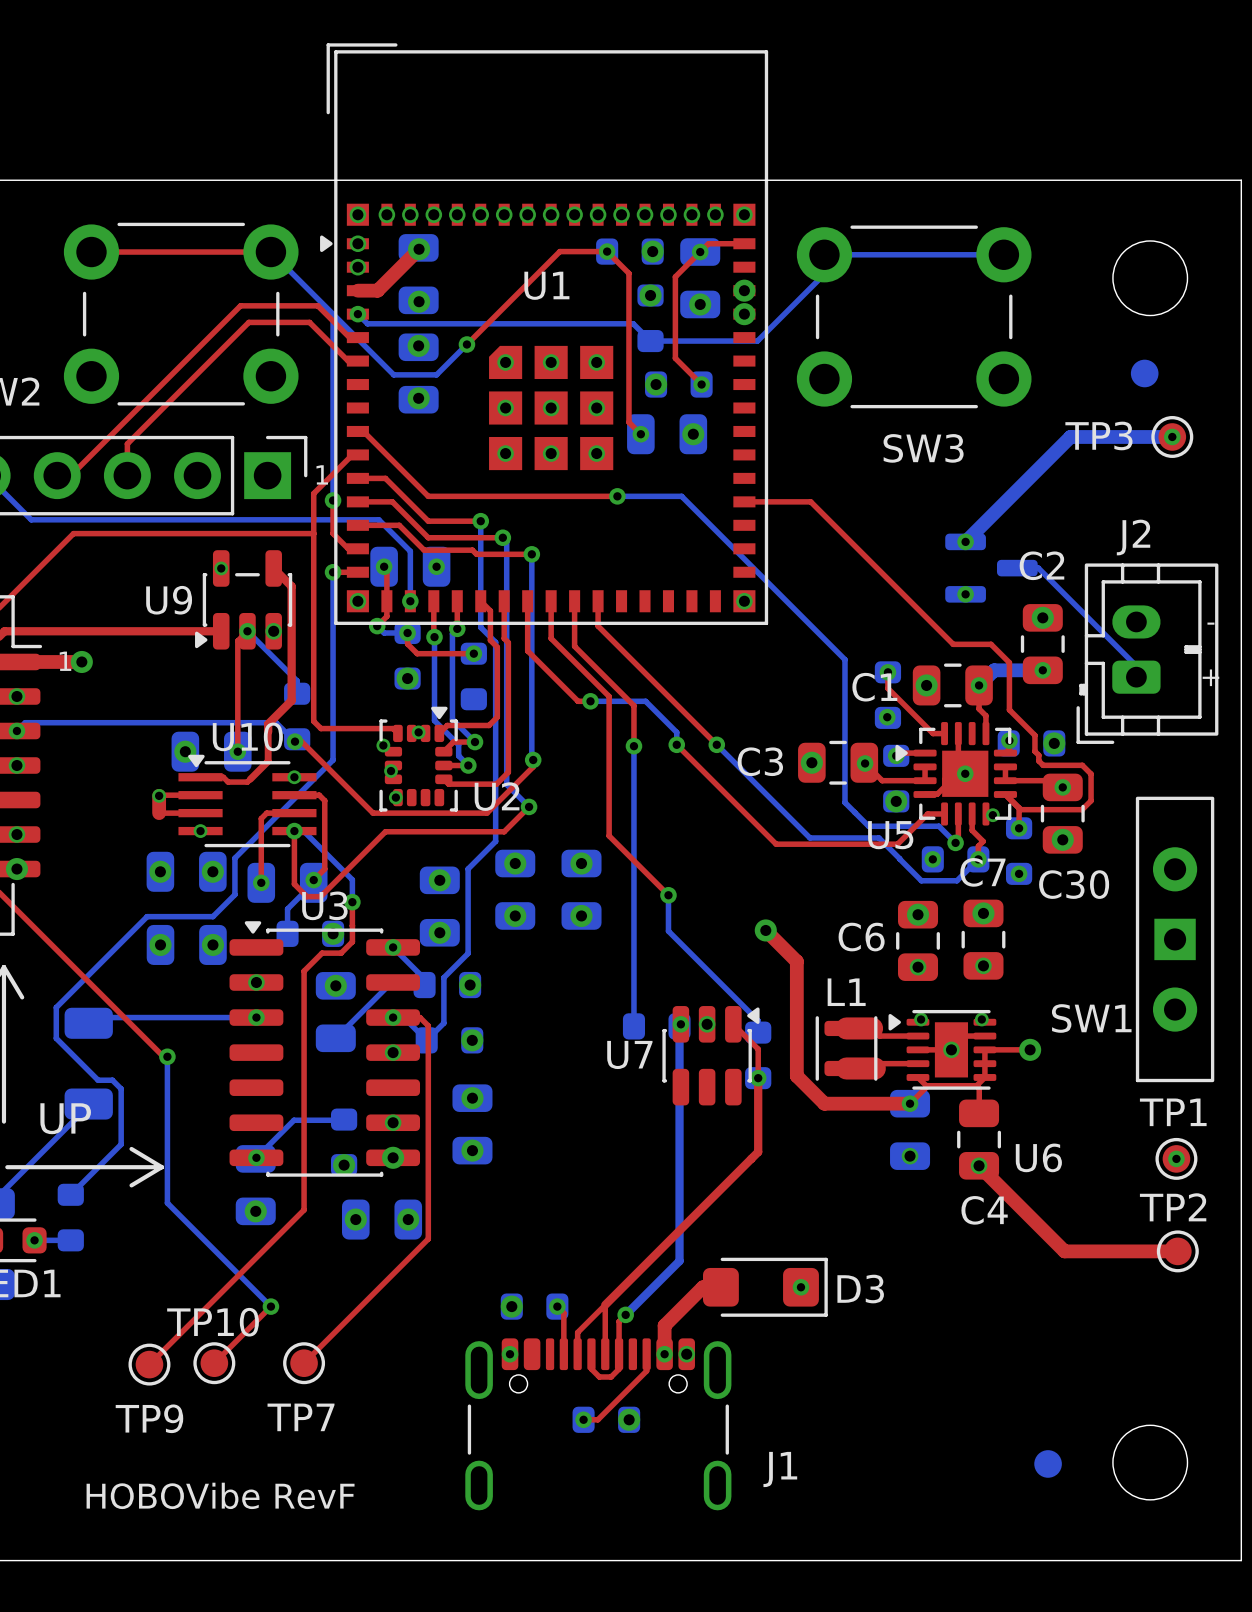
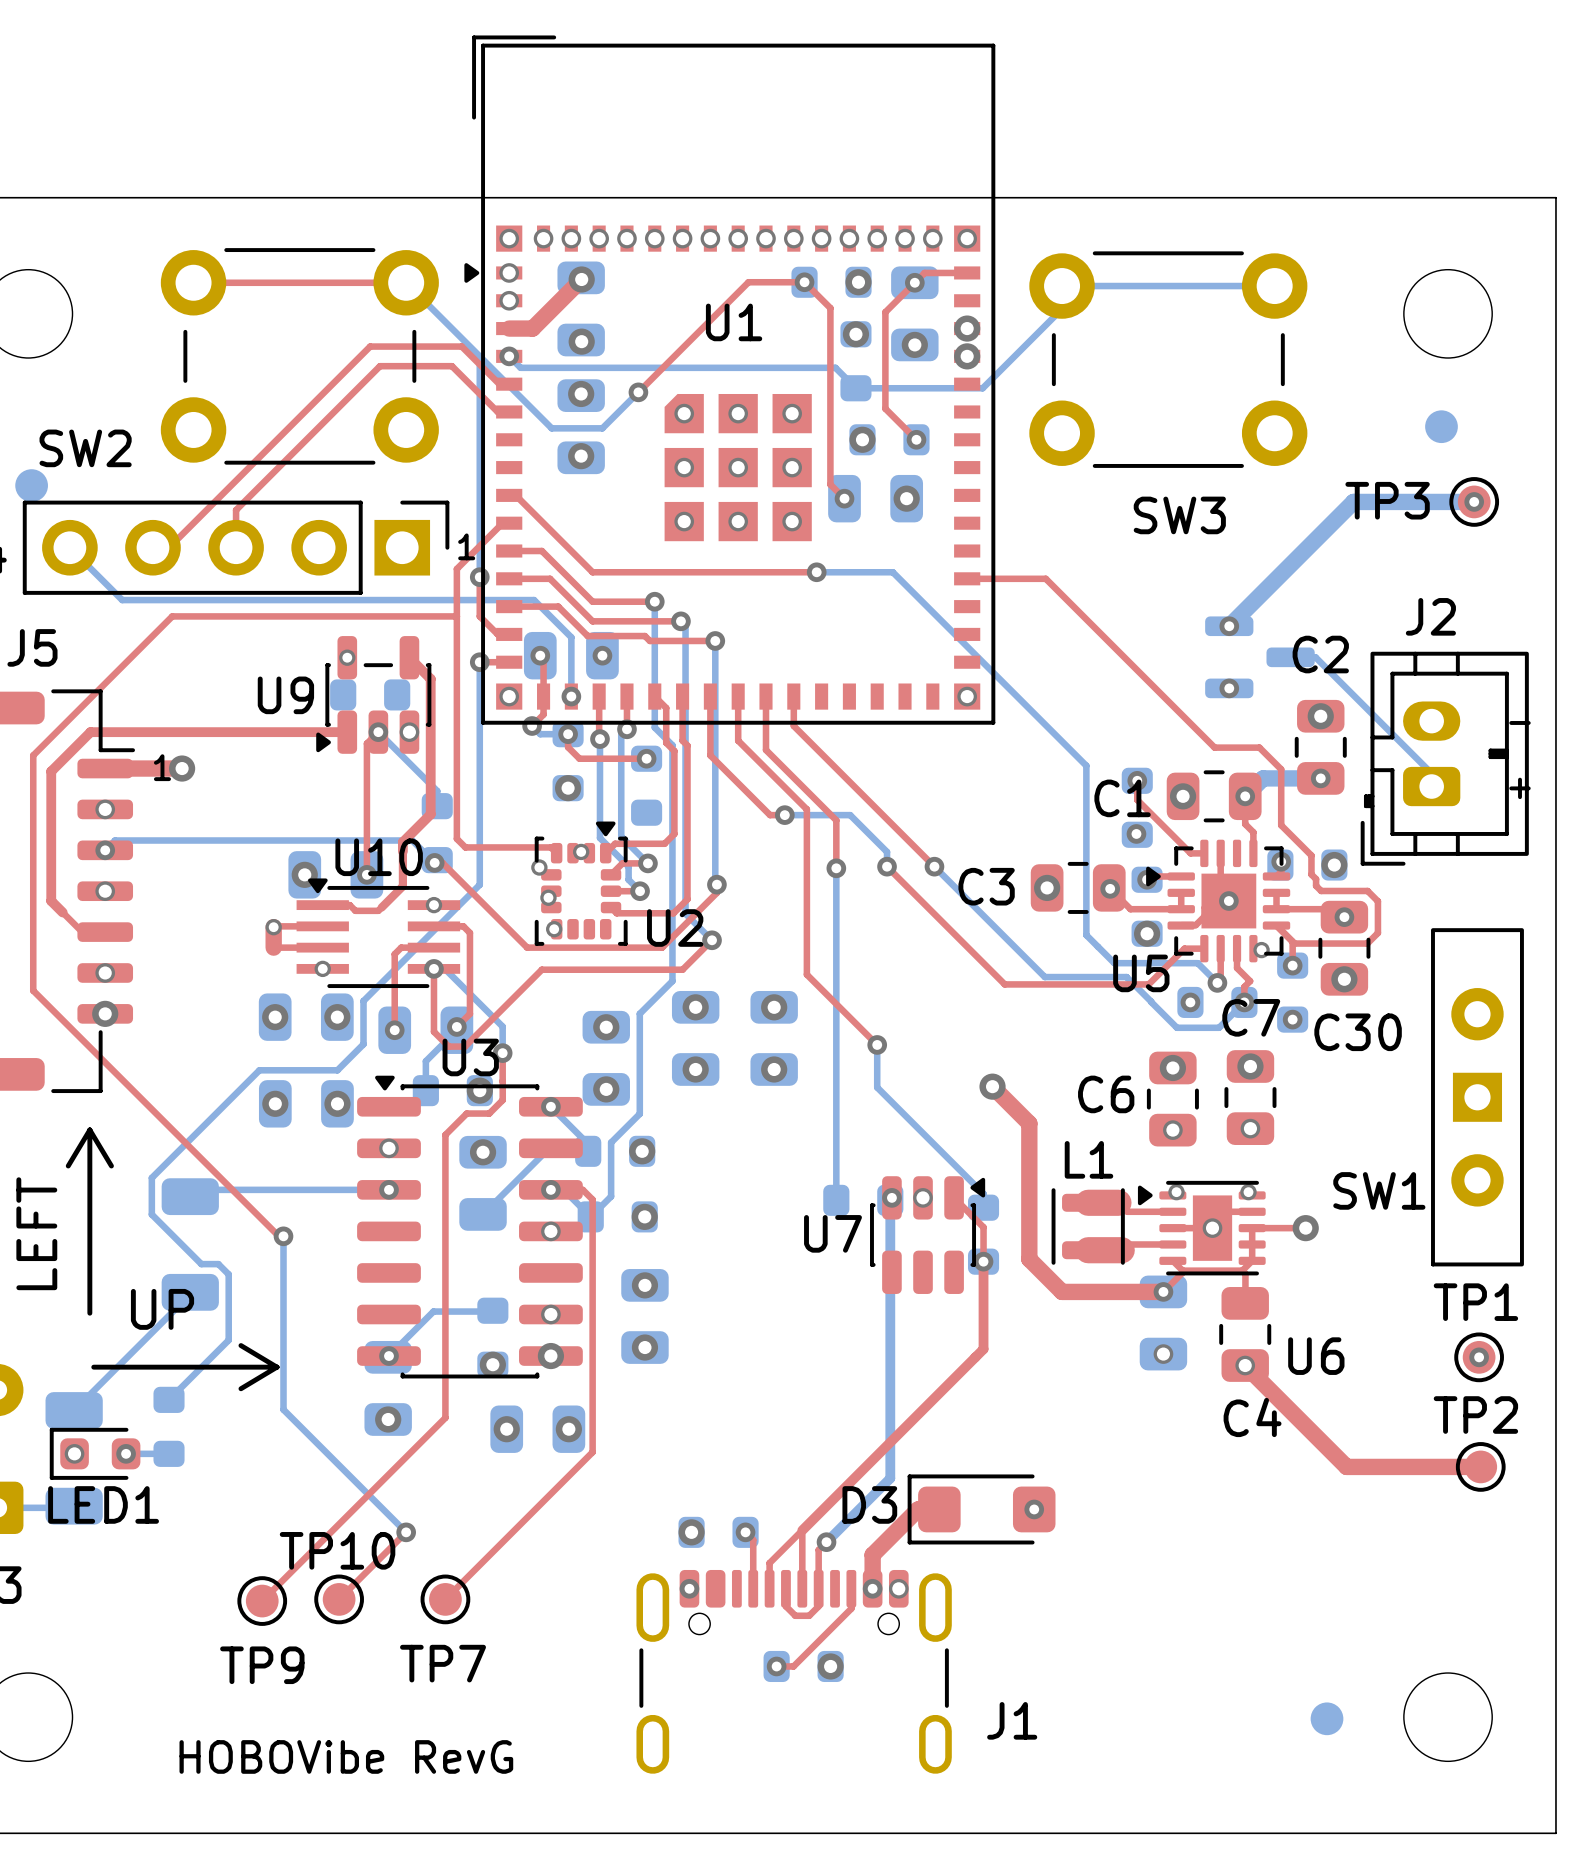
part: none -> (370, 694)
D3 rotation: 0° (765, 1287) -> 180° (981, 1509)
text: HOBOVibe RevF (220, 1495) -> HOBOVibe RevG (346, 1756)

